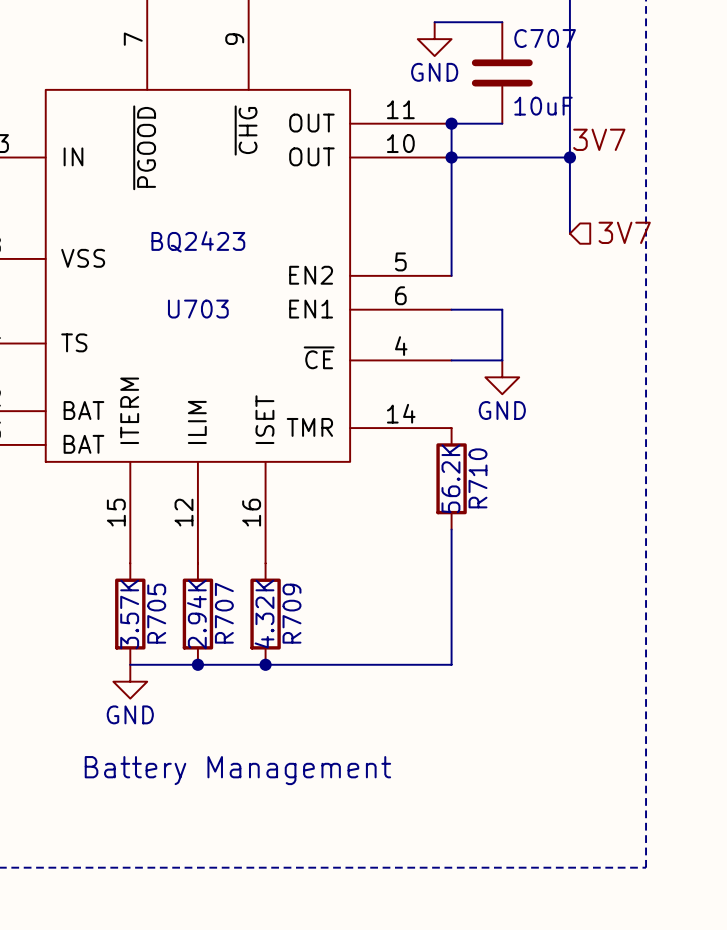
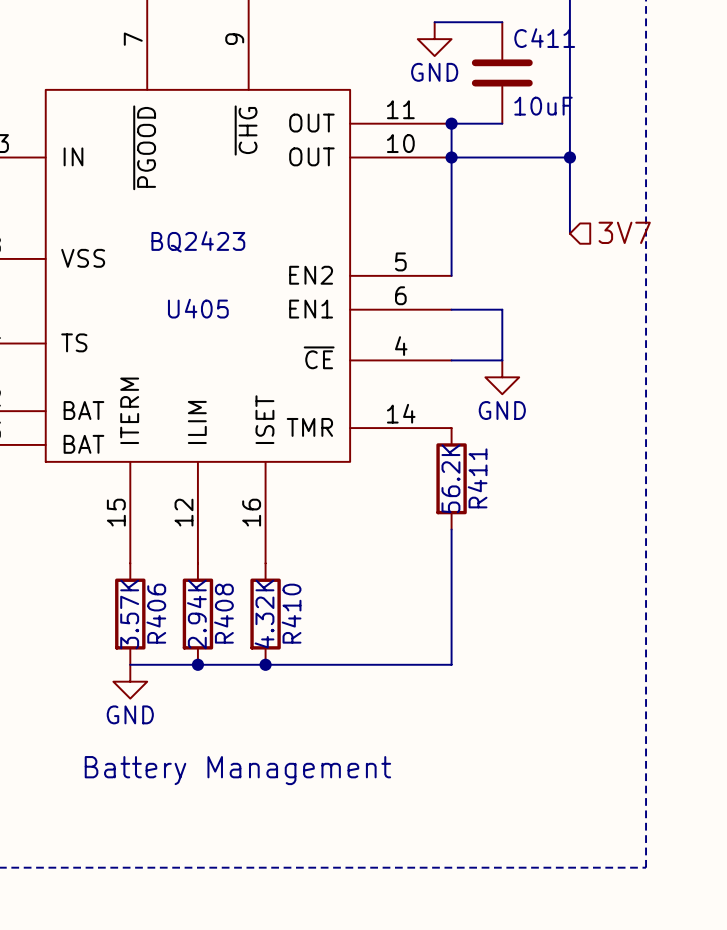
C707 name: C707 (545, 38) -> C411 (544, 38)
label: 3V7 (599, 139) -> none
U703 name: U703 (198, 309) -> U405 (198, 308)
R710 name: R710 (478, 478) -> R411 (477, 478)
R705 name: R705 (156, 613) -> R406 (156, 613)
R707 name: R707 (224, 613) -> R408 (223, 613)
R709 name: R709 (292, 613) -> R410 (291, 613)

